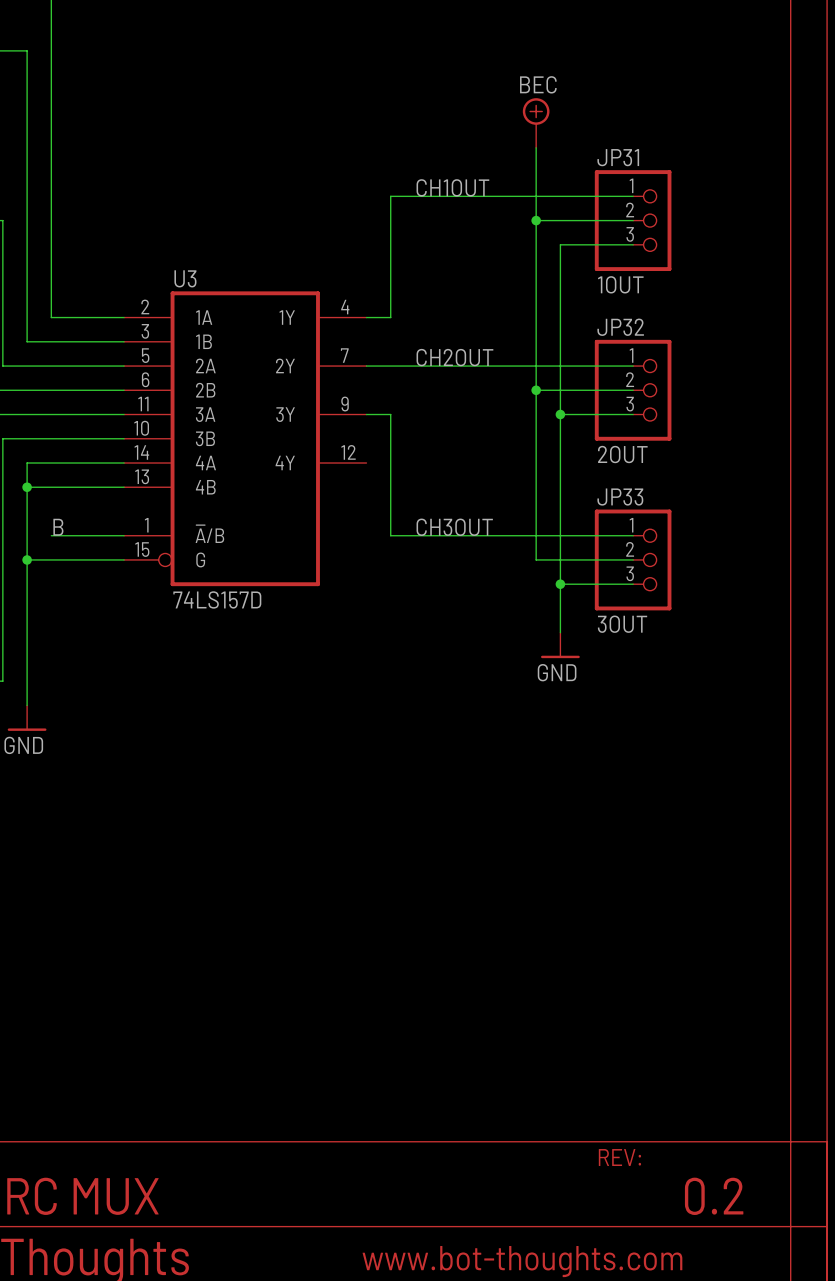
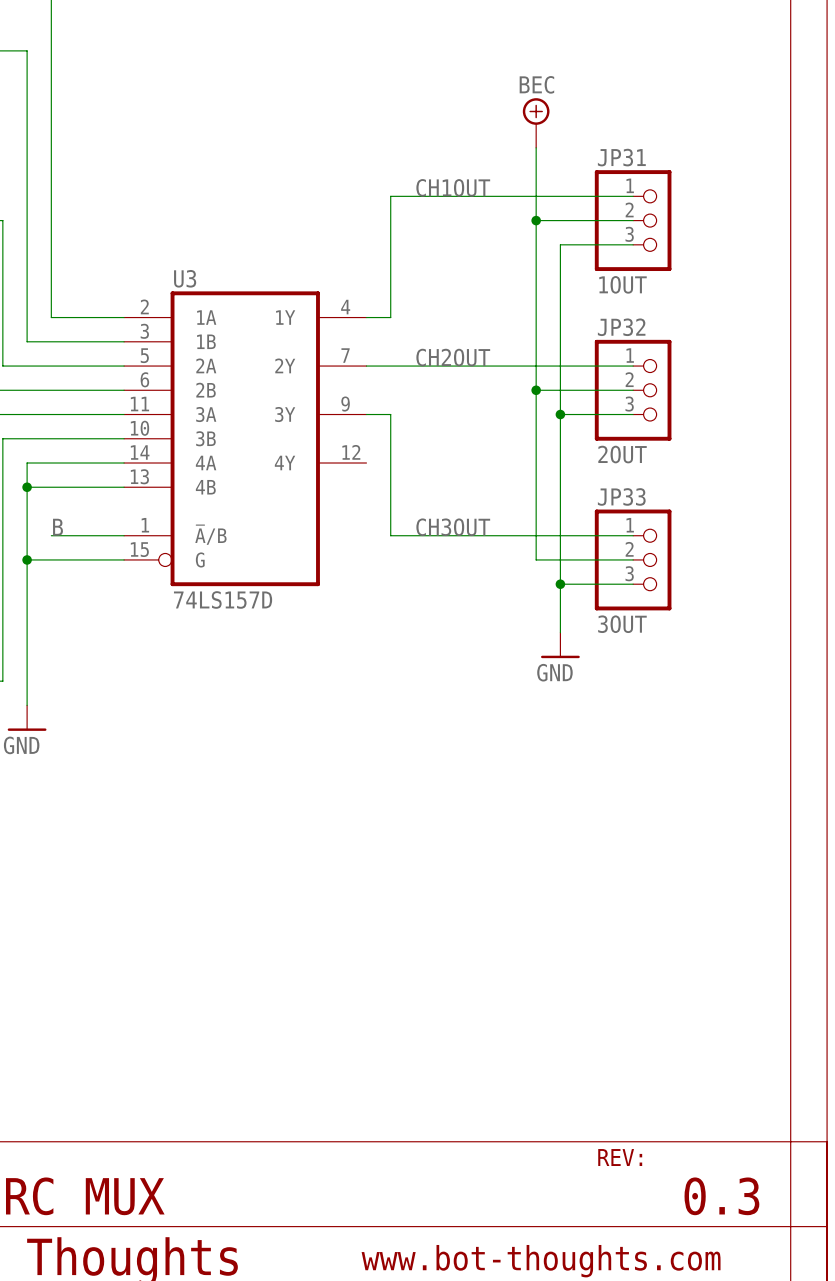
text: 0.2 (714, 1196) -> 0.3 (721, 1196)

